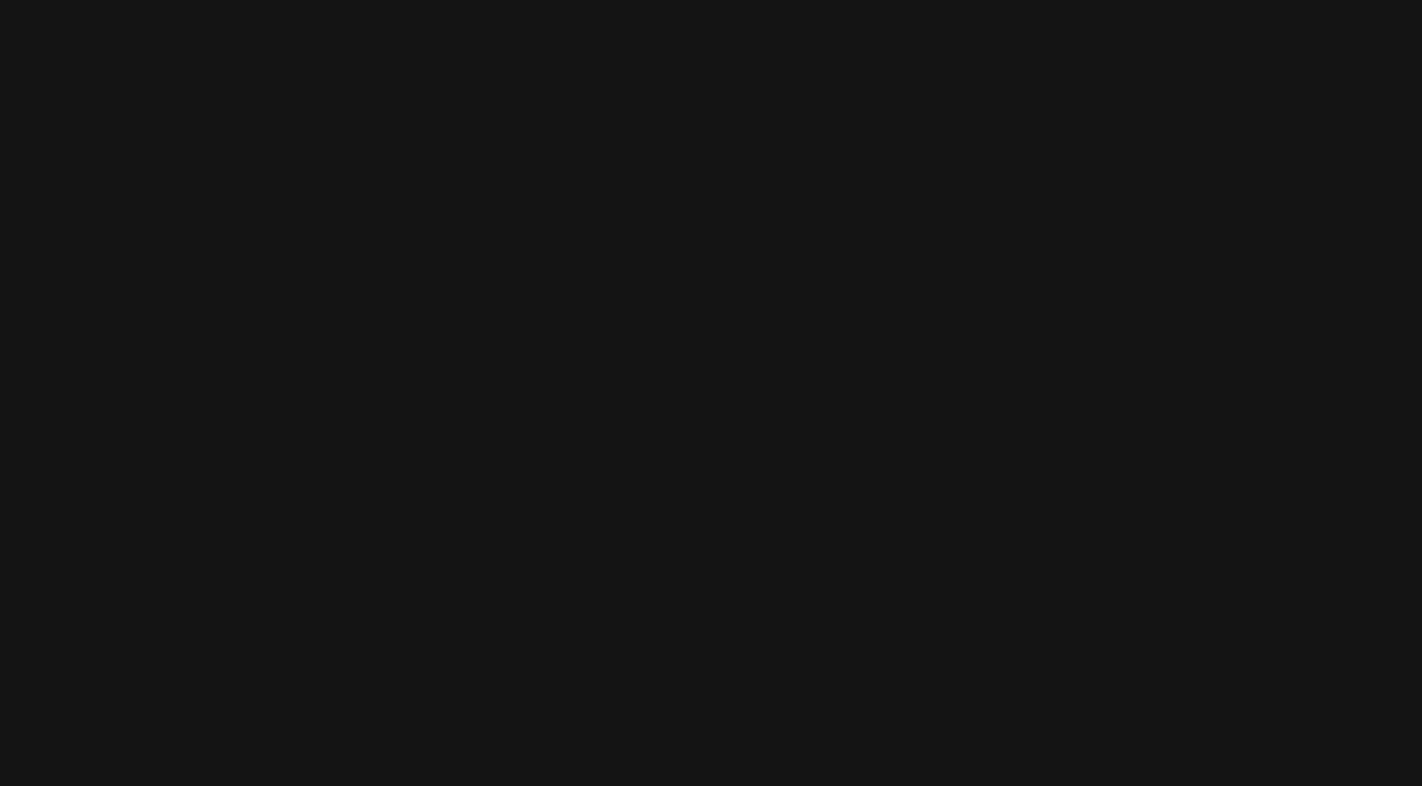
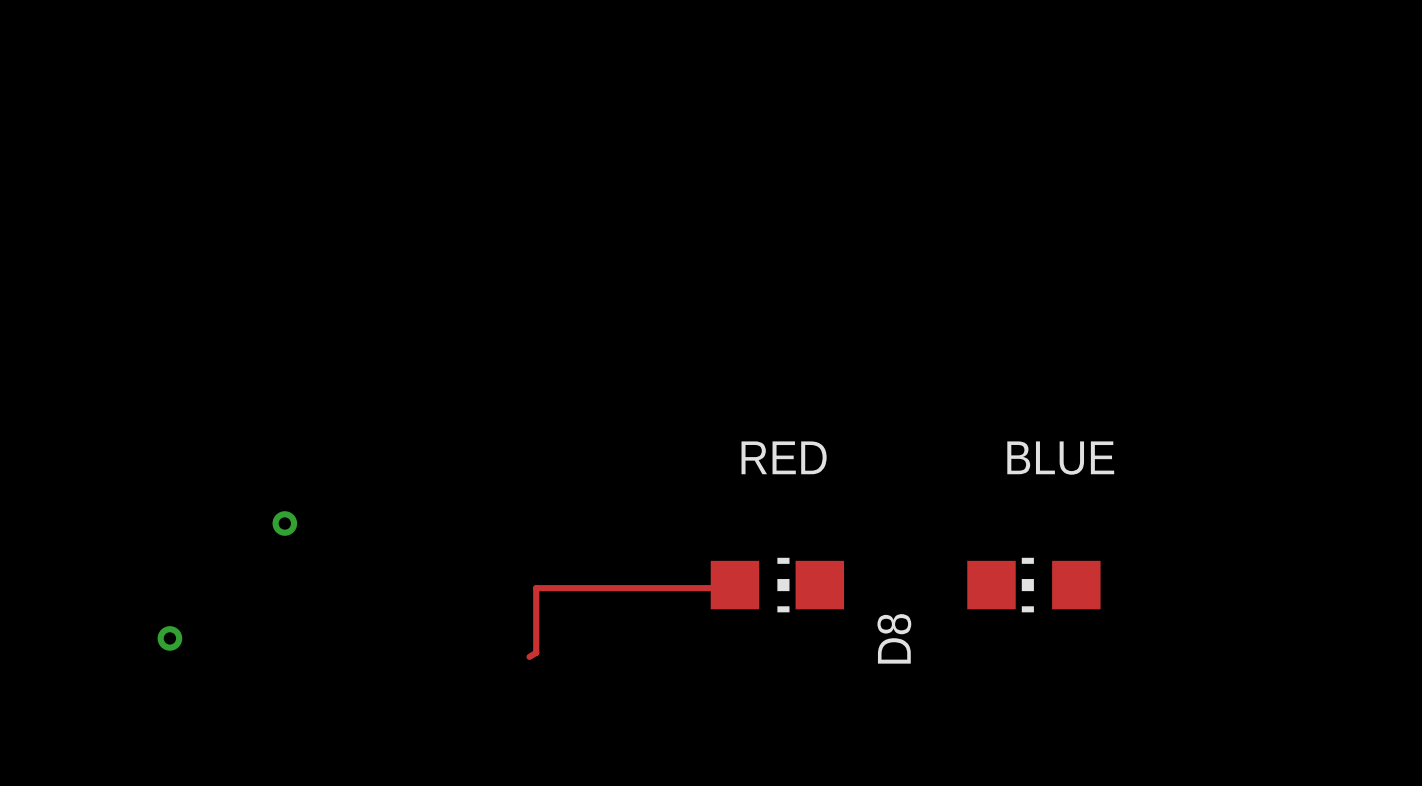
text: none -> RED (784, 457)
text: none -> BLUE (1060, 458)
via: none -> (284, 523)
track: none -> (734, 585) (730, 588) (536, 588) (536, 652) (529, 656)
part: none -> (777, 585)
part: none -> (1033, 585)
text: none -> D8 (894, 638)
via: none -> (169, 638)

